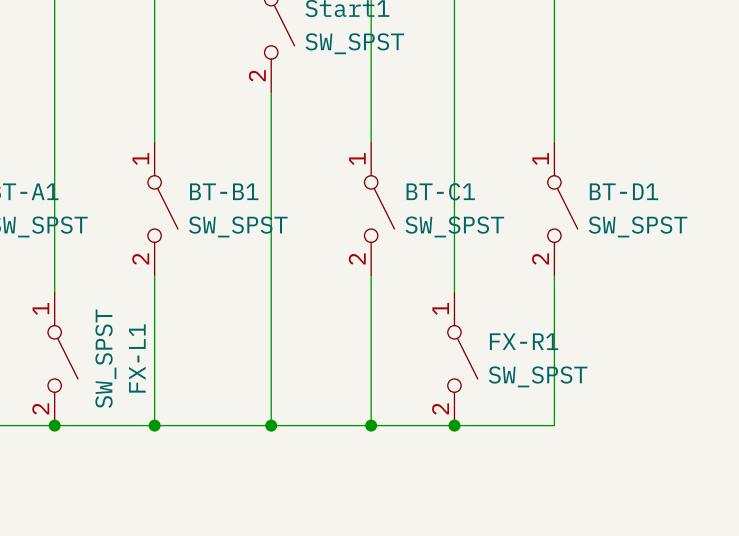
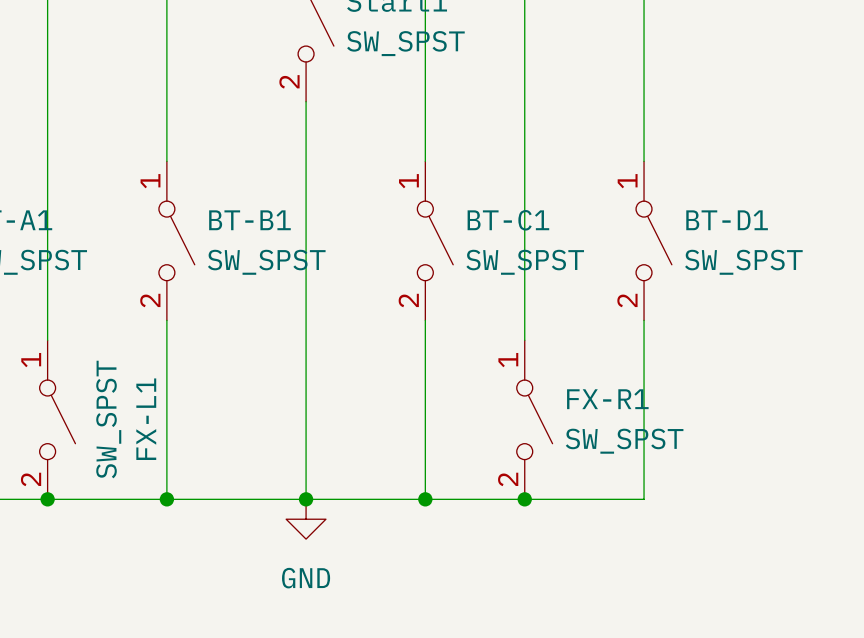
power symbol: none -> GND (306, 519)

